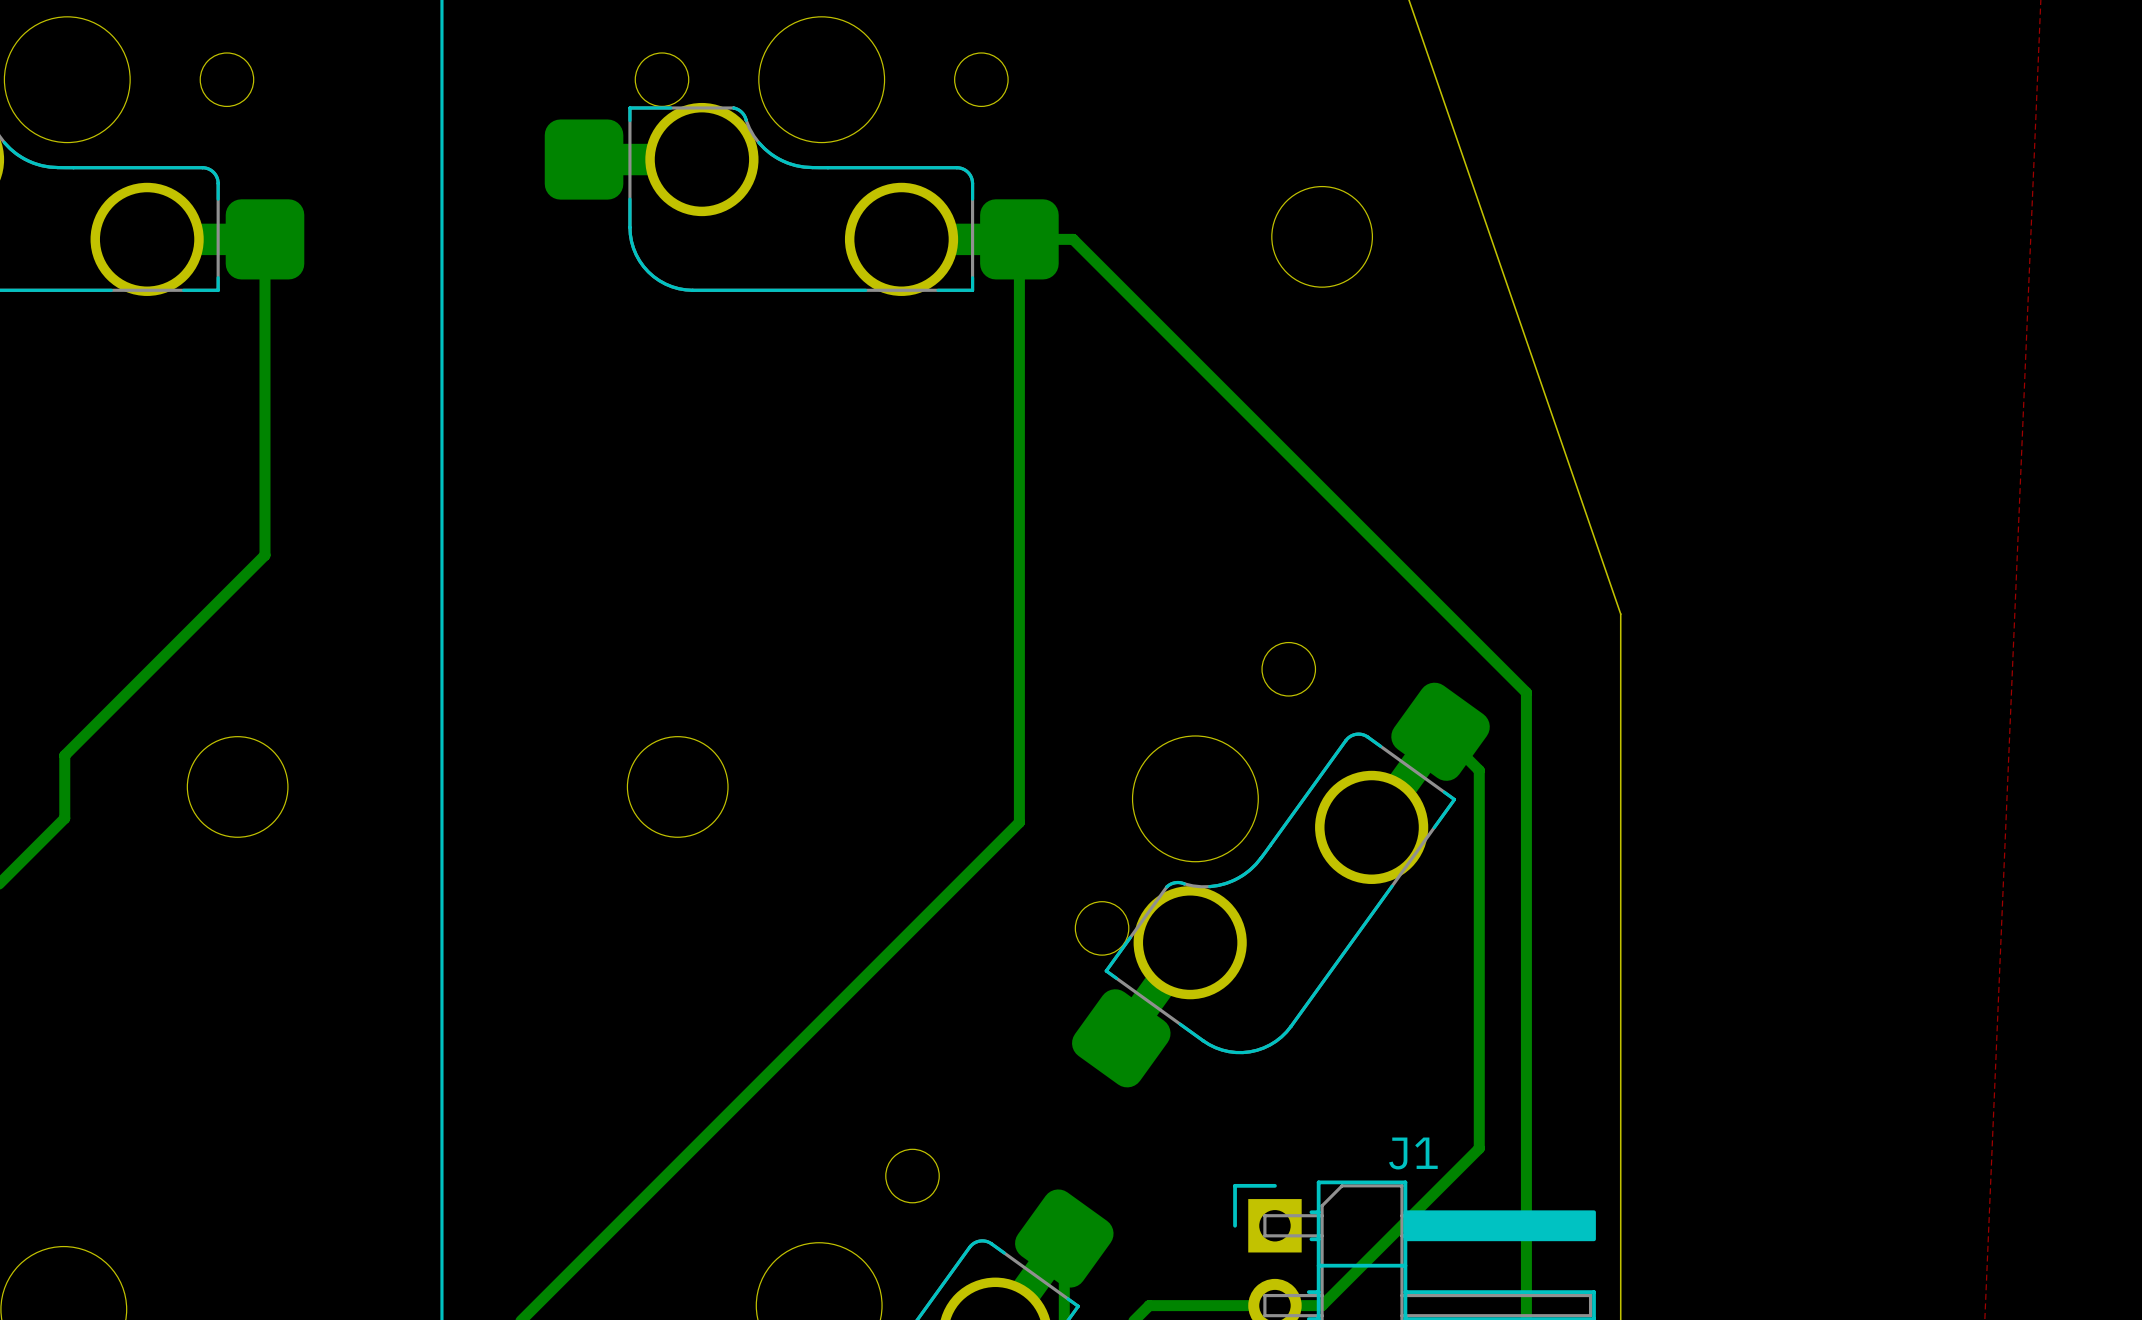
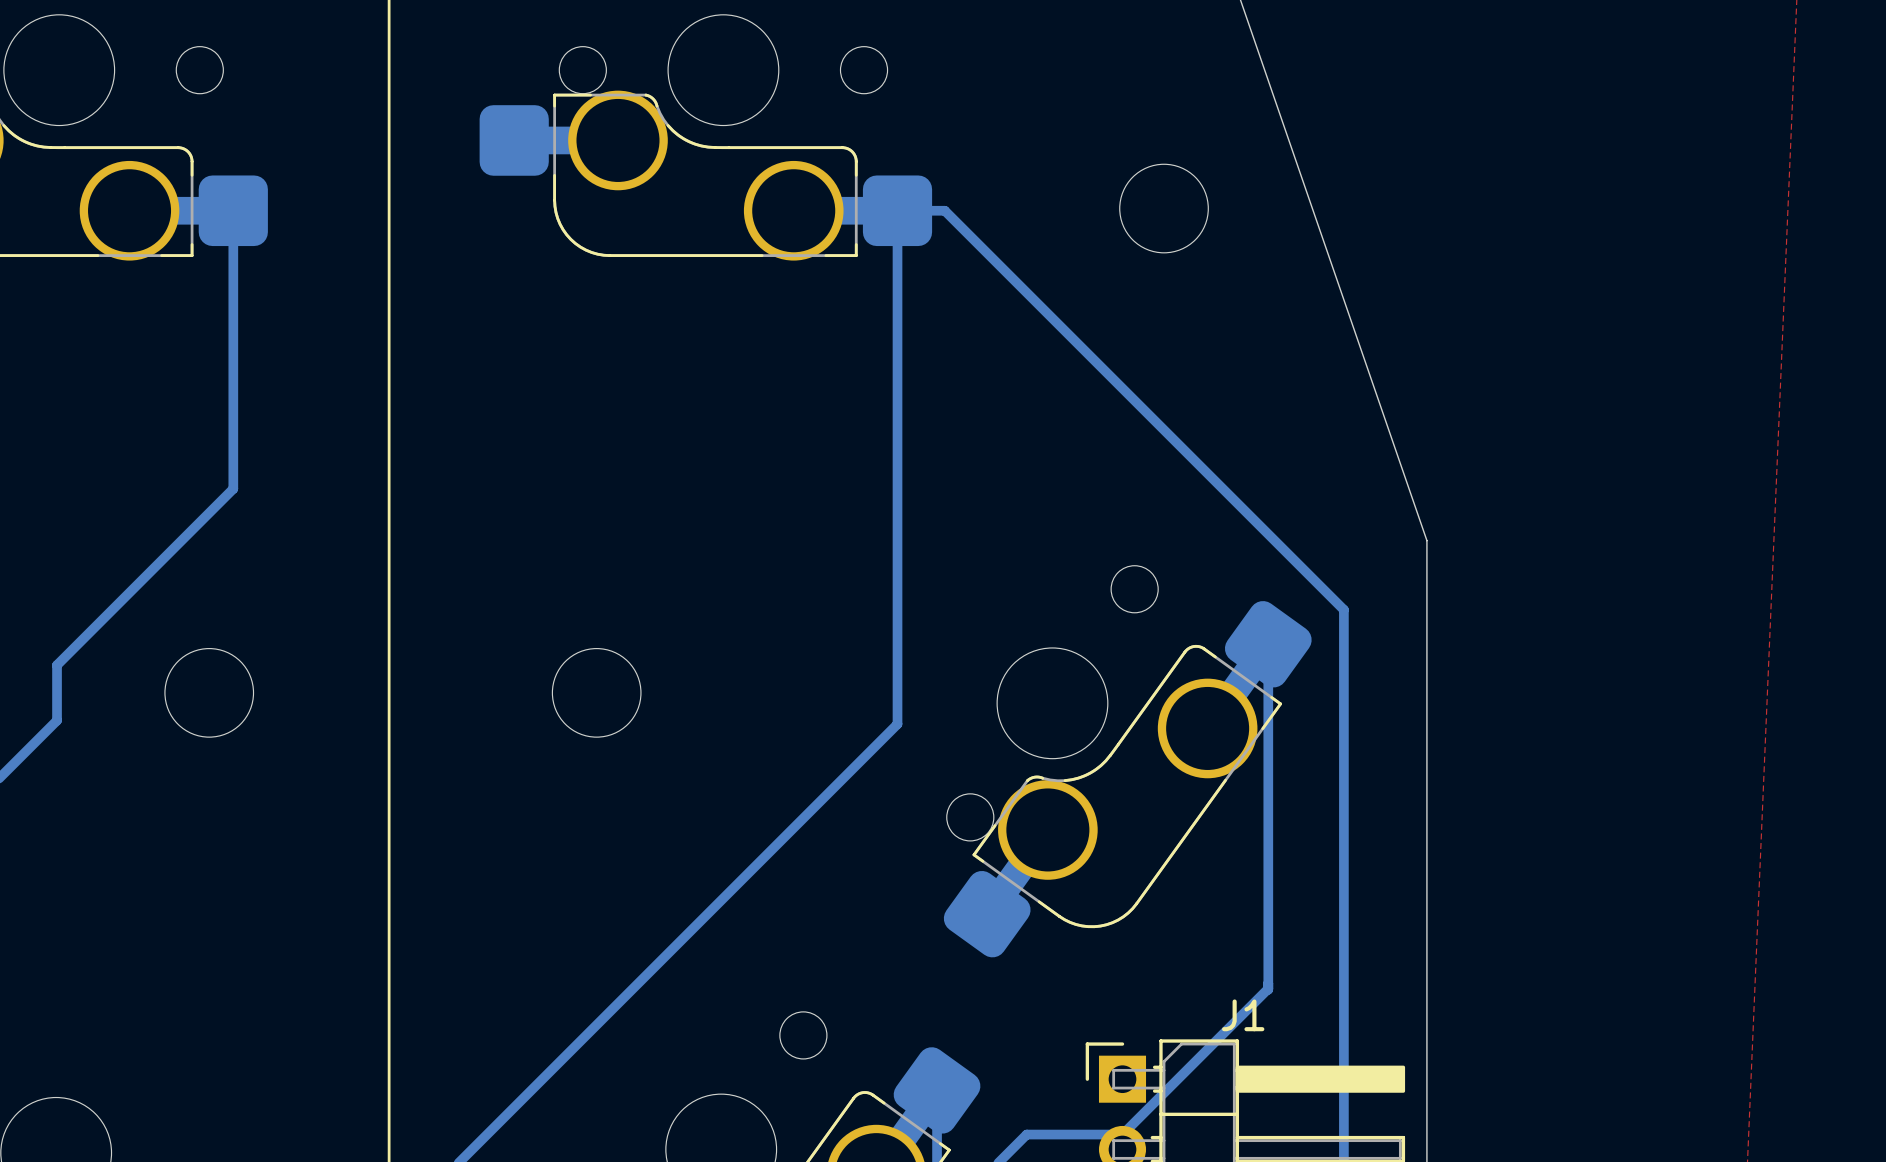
bottom track: (1440, 731) (1479, 770) (1479, 1148) (1322, 1305) (1149, 1305) -> (1268, 644) (1268, 989)
bottom track: none -> (1268, 988) (1122, 1134) (1026, 1134) (1011, 1149)

